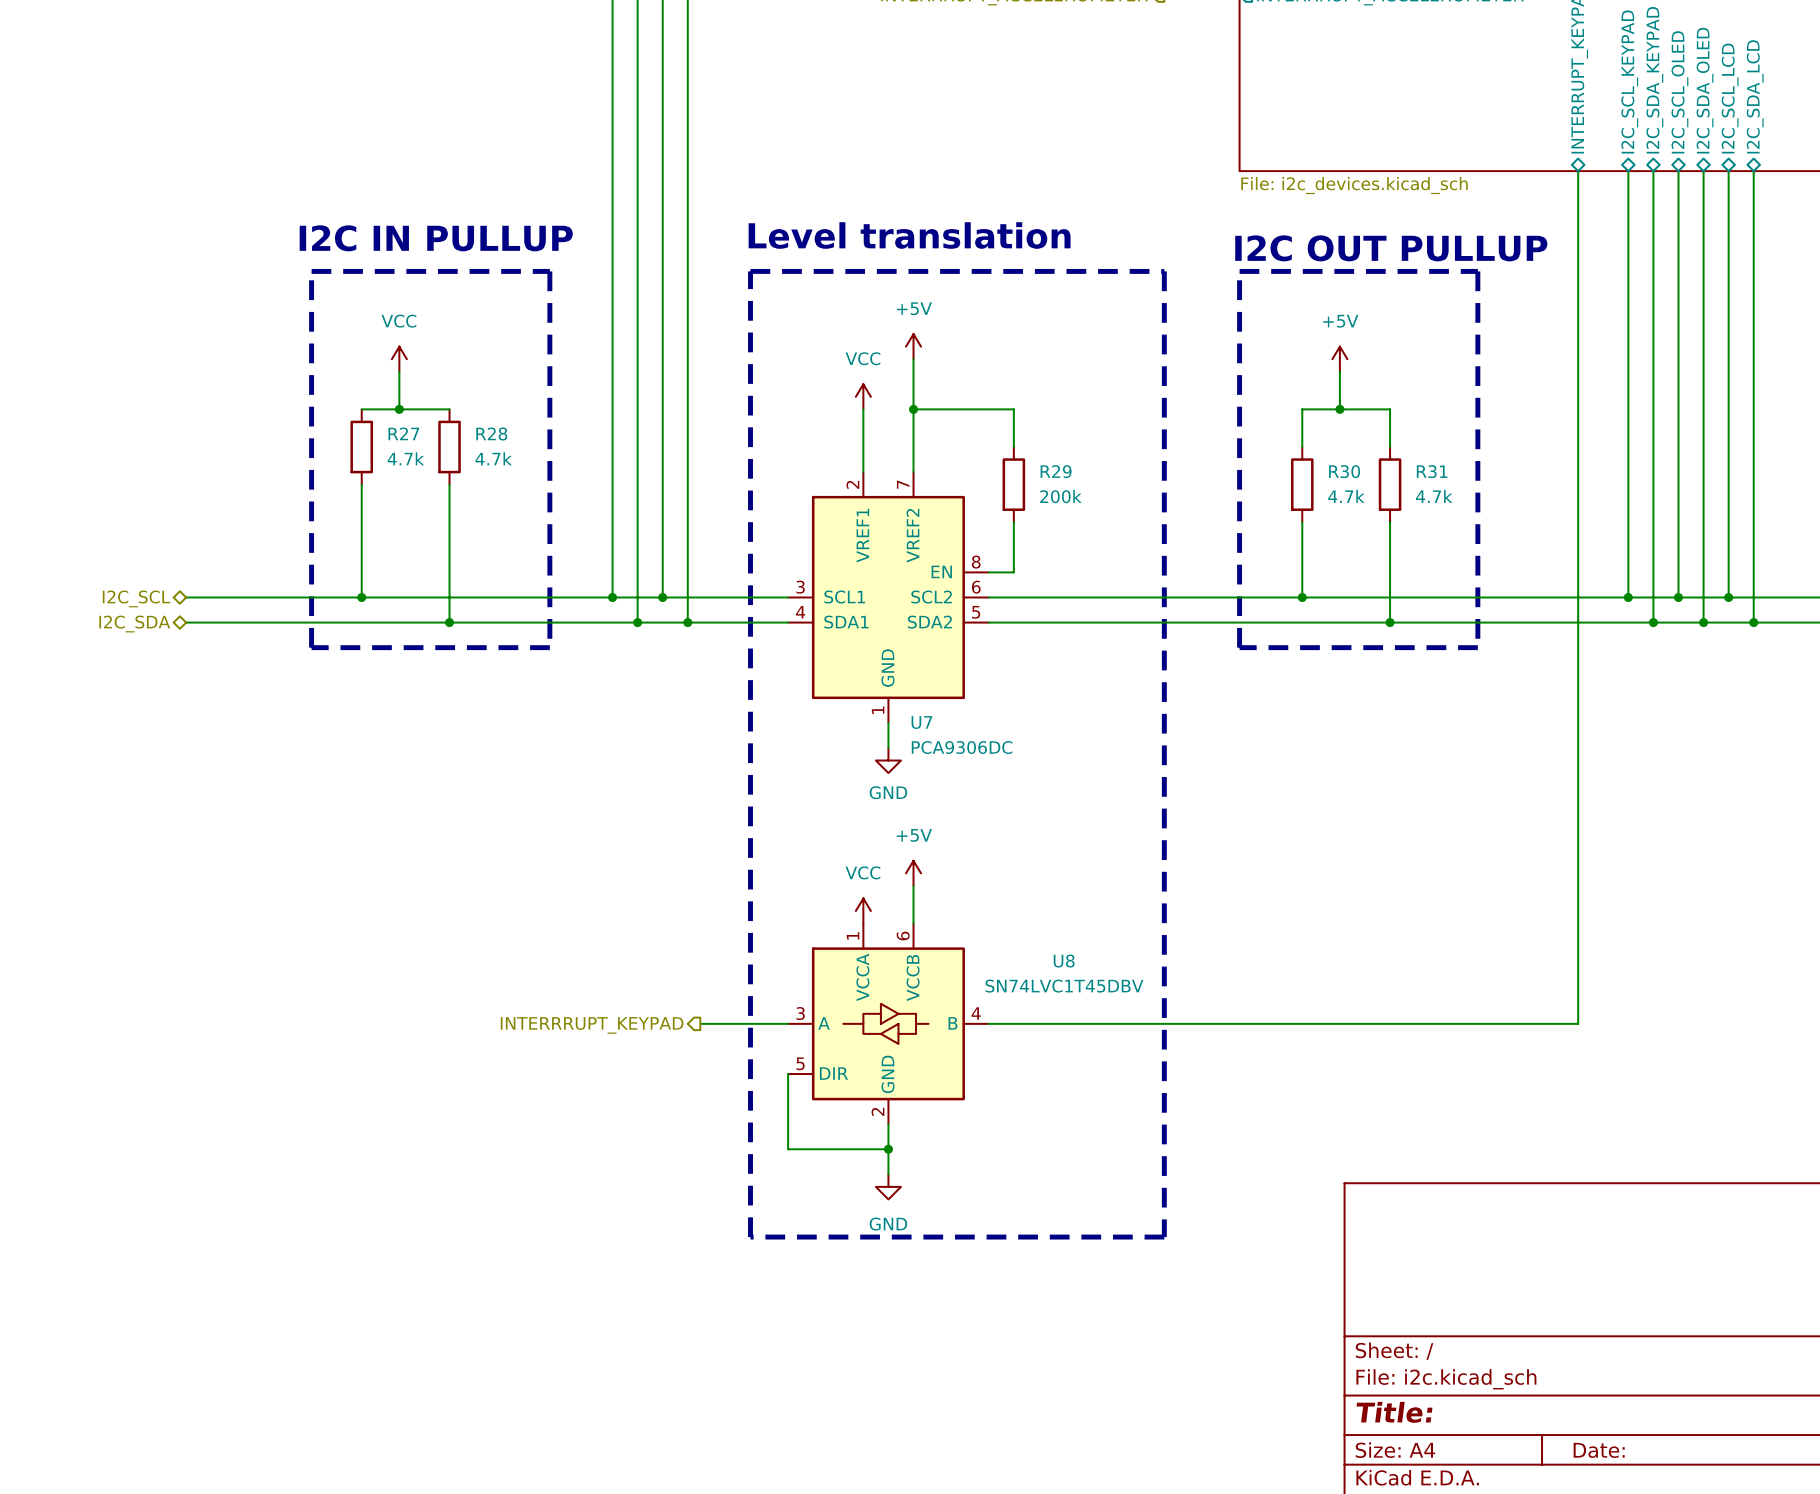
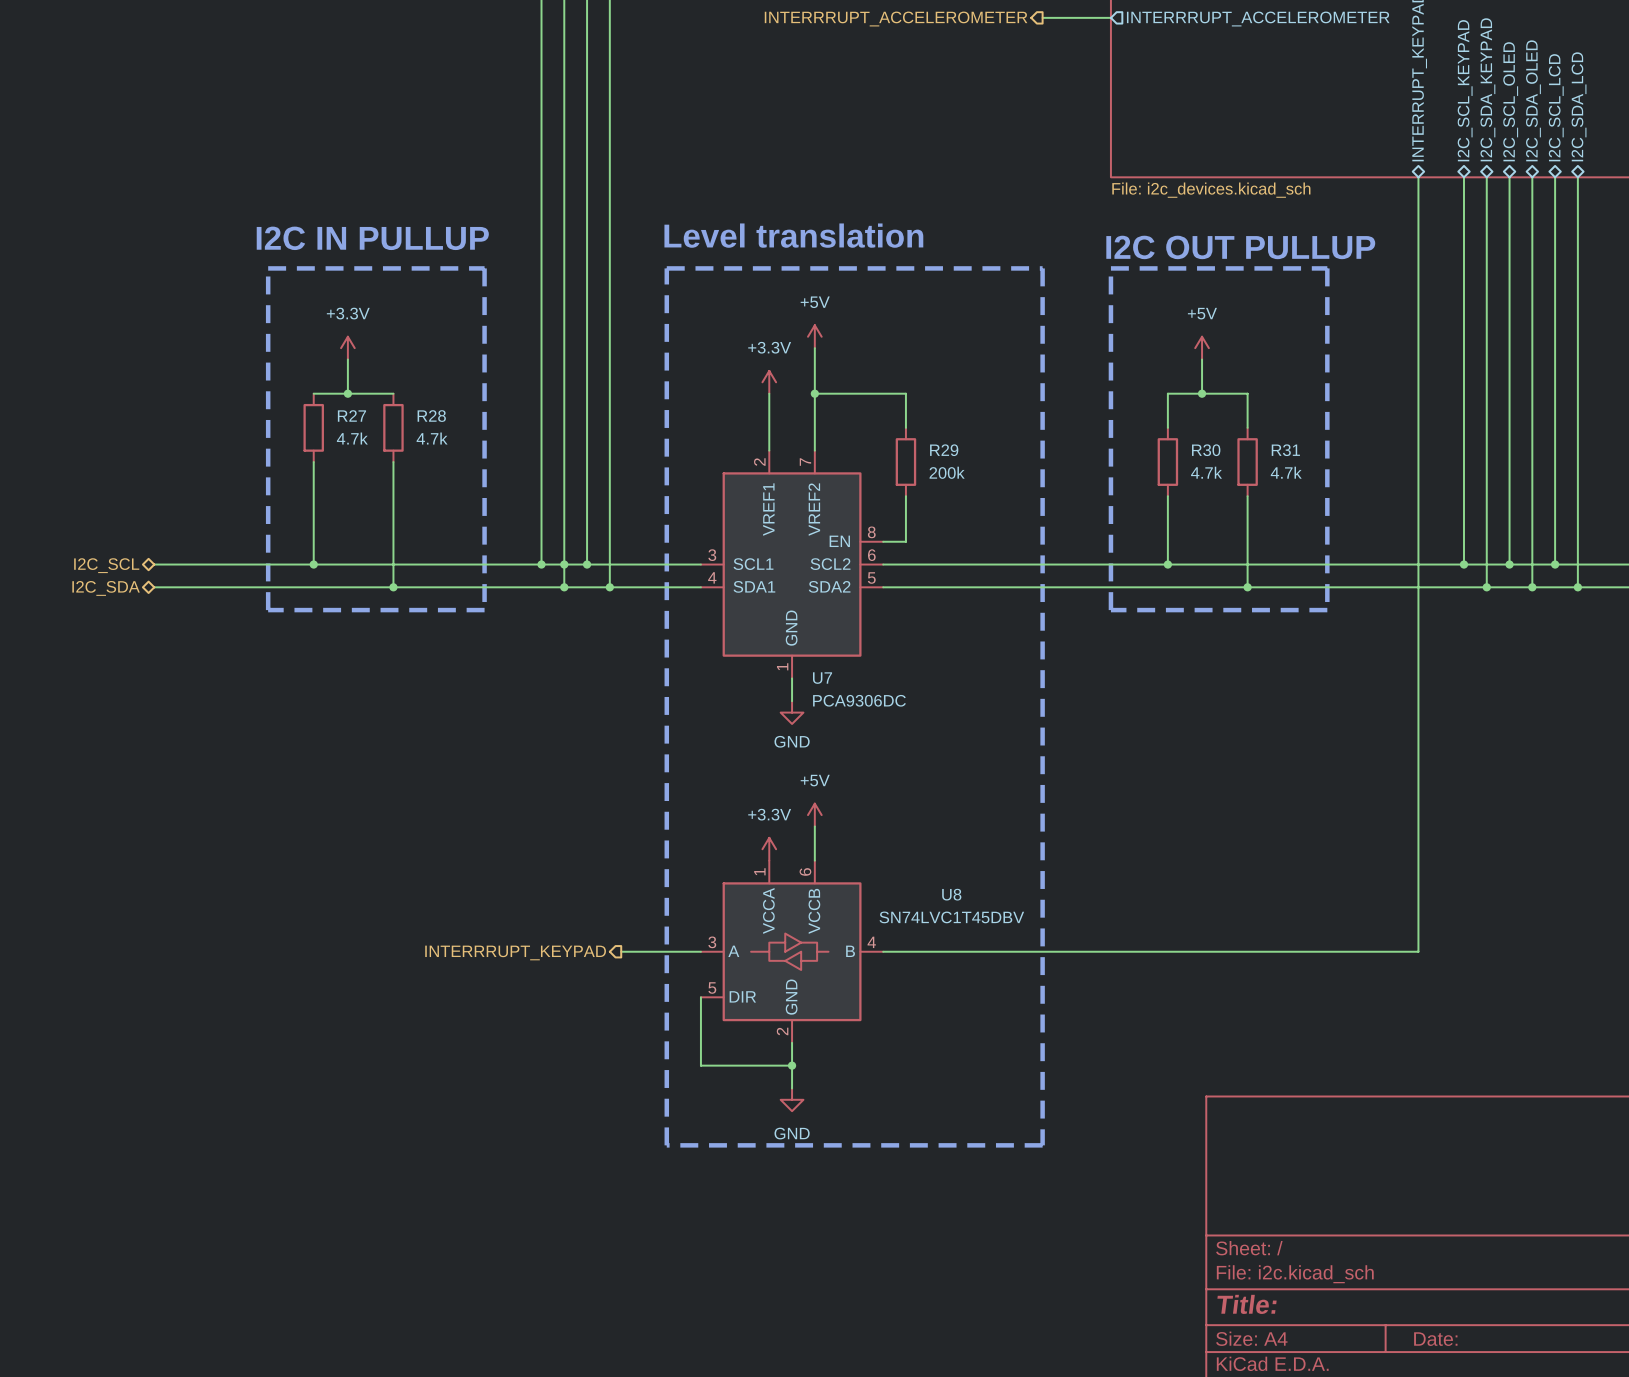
power symbol: VCC (399, 359) -> +3.3V (347, 348)
power symbol: VCC (863, 396) -> +3.3V (769, 382)
junction: none -> (564, 564)
power symbol: VCC (863, 911) -> +3.3V (769, 849)

